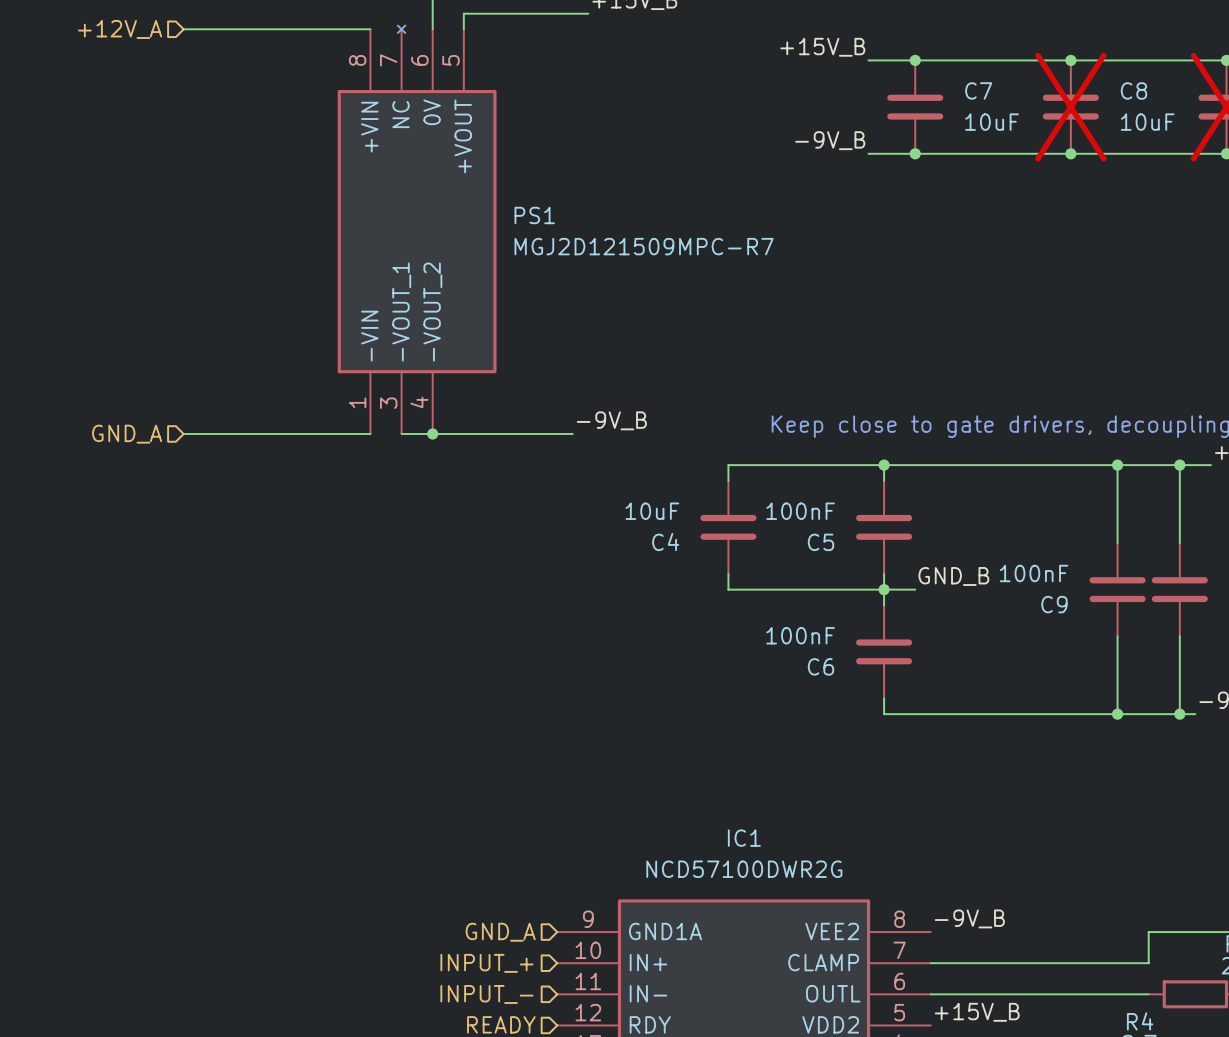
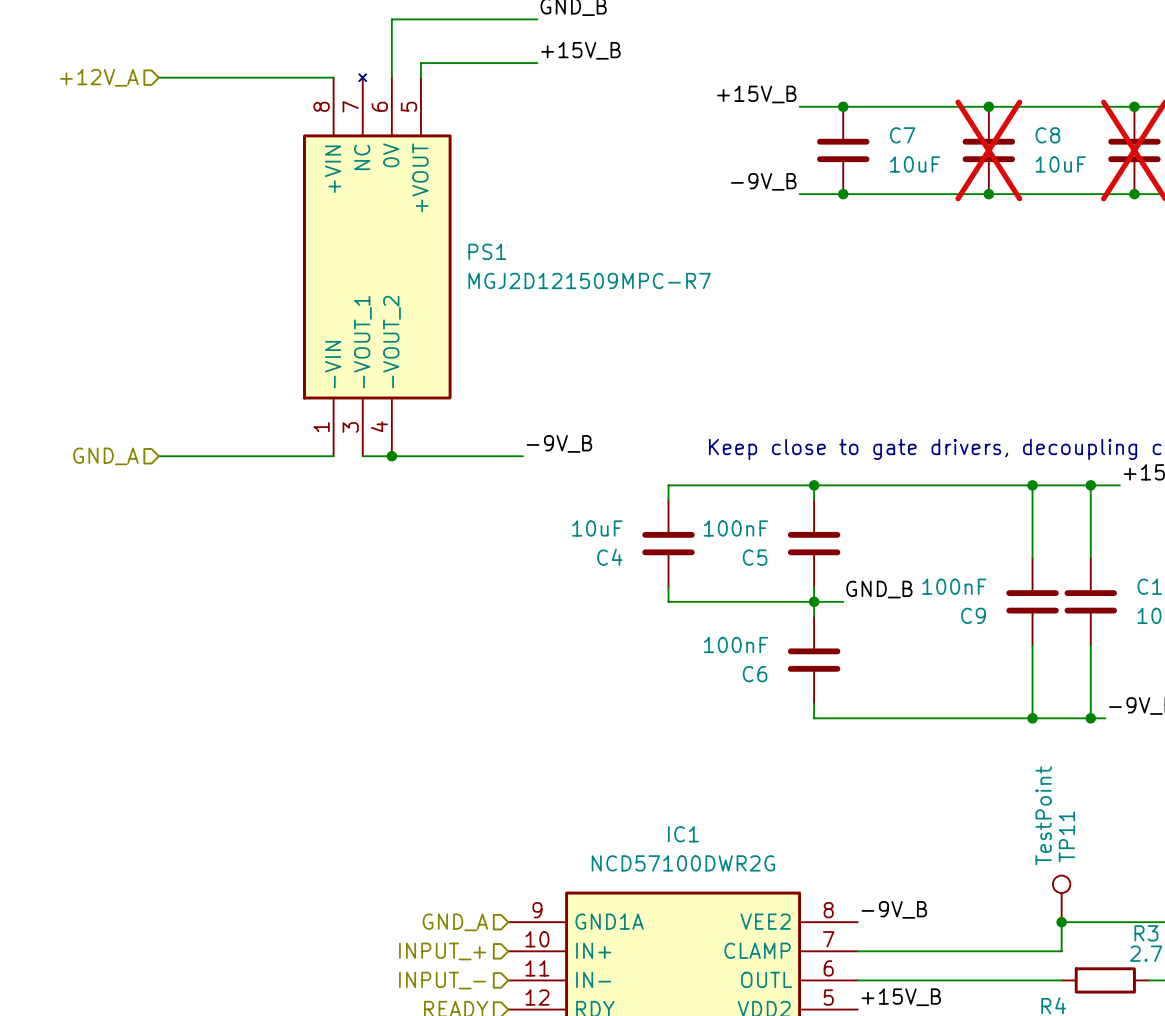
TP11: none -> TestPoint (1061, 898)
junction: none -> (1061, 922)

